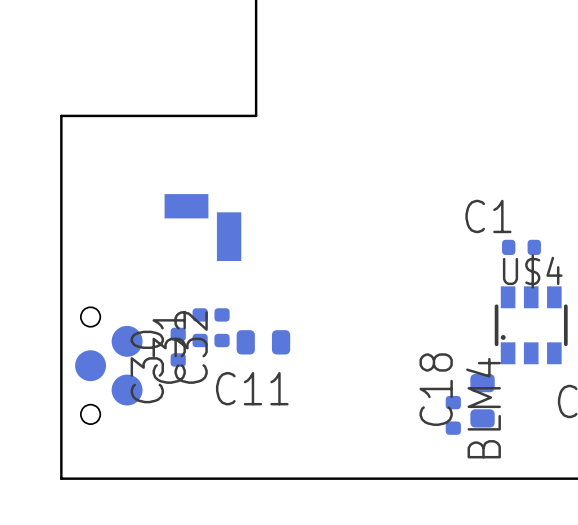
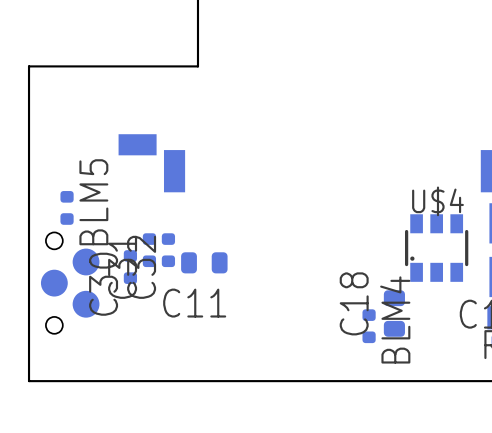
C1: (521, 247) -> none
BLM5: none -> (67, 207)

